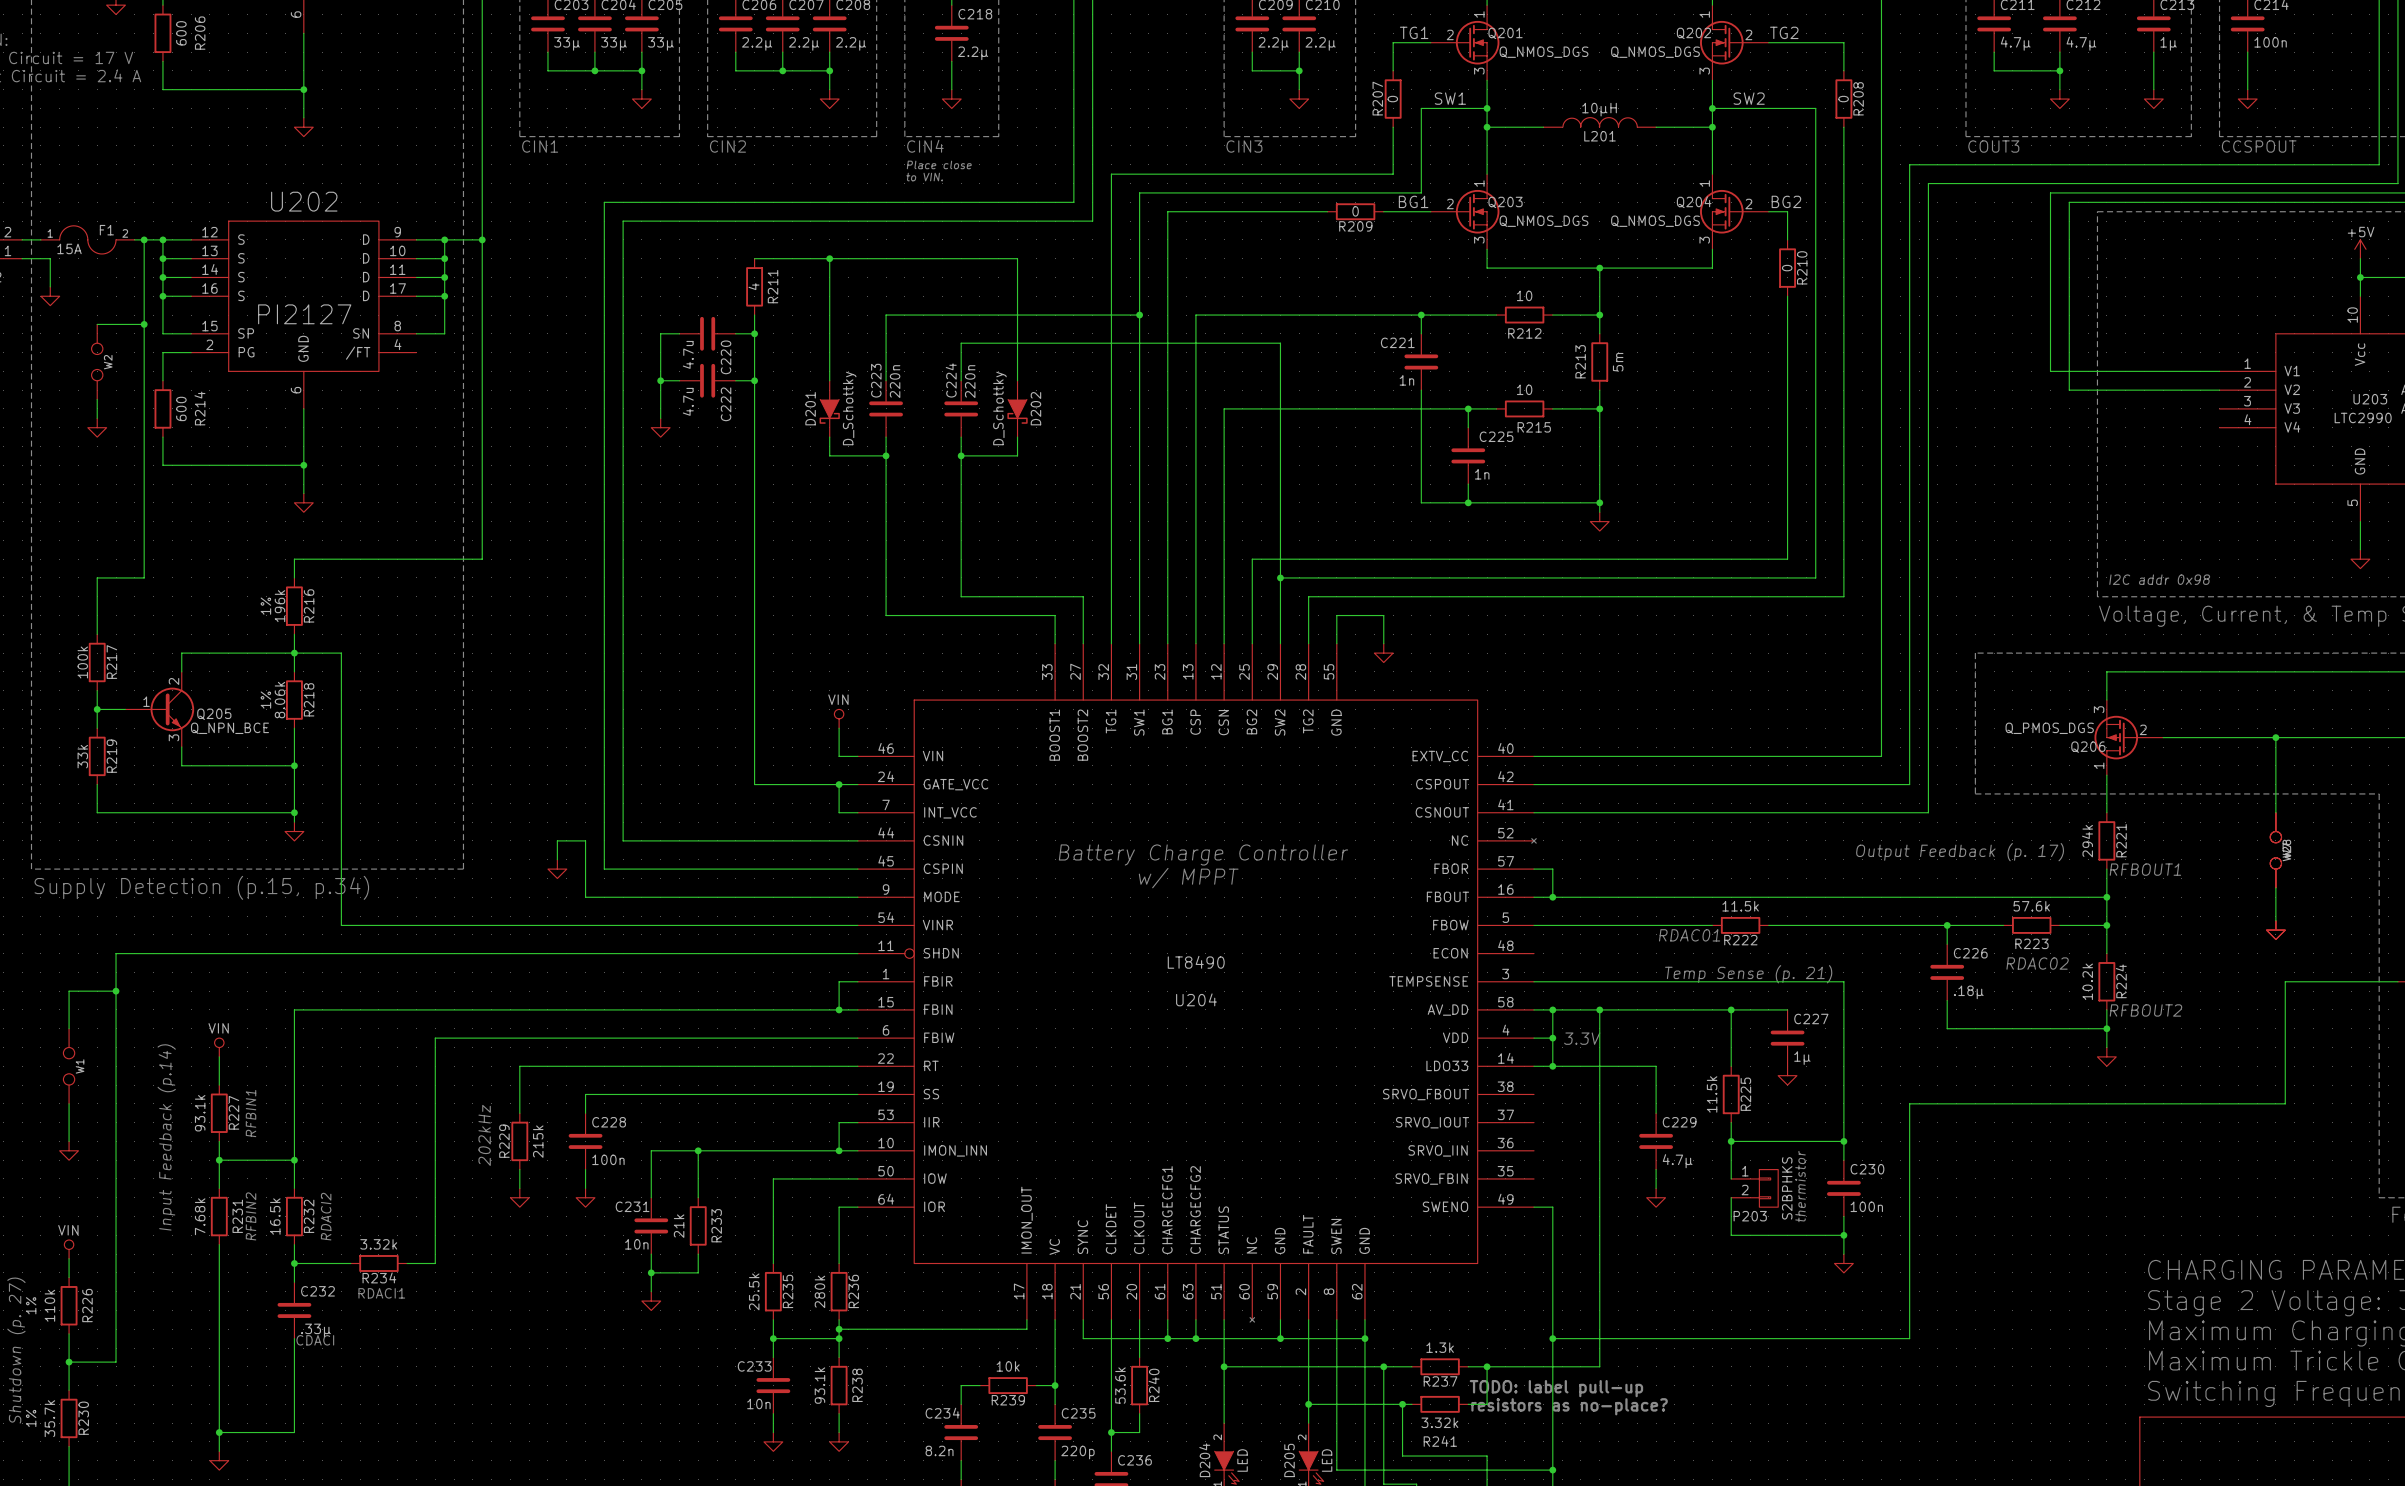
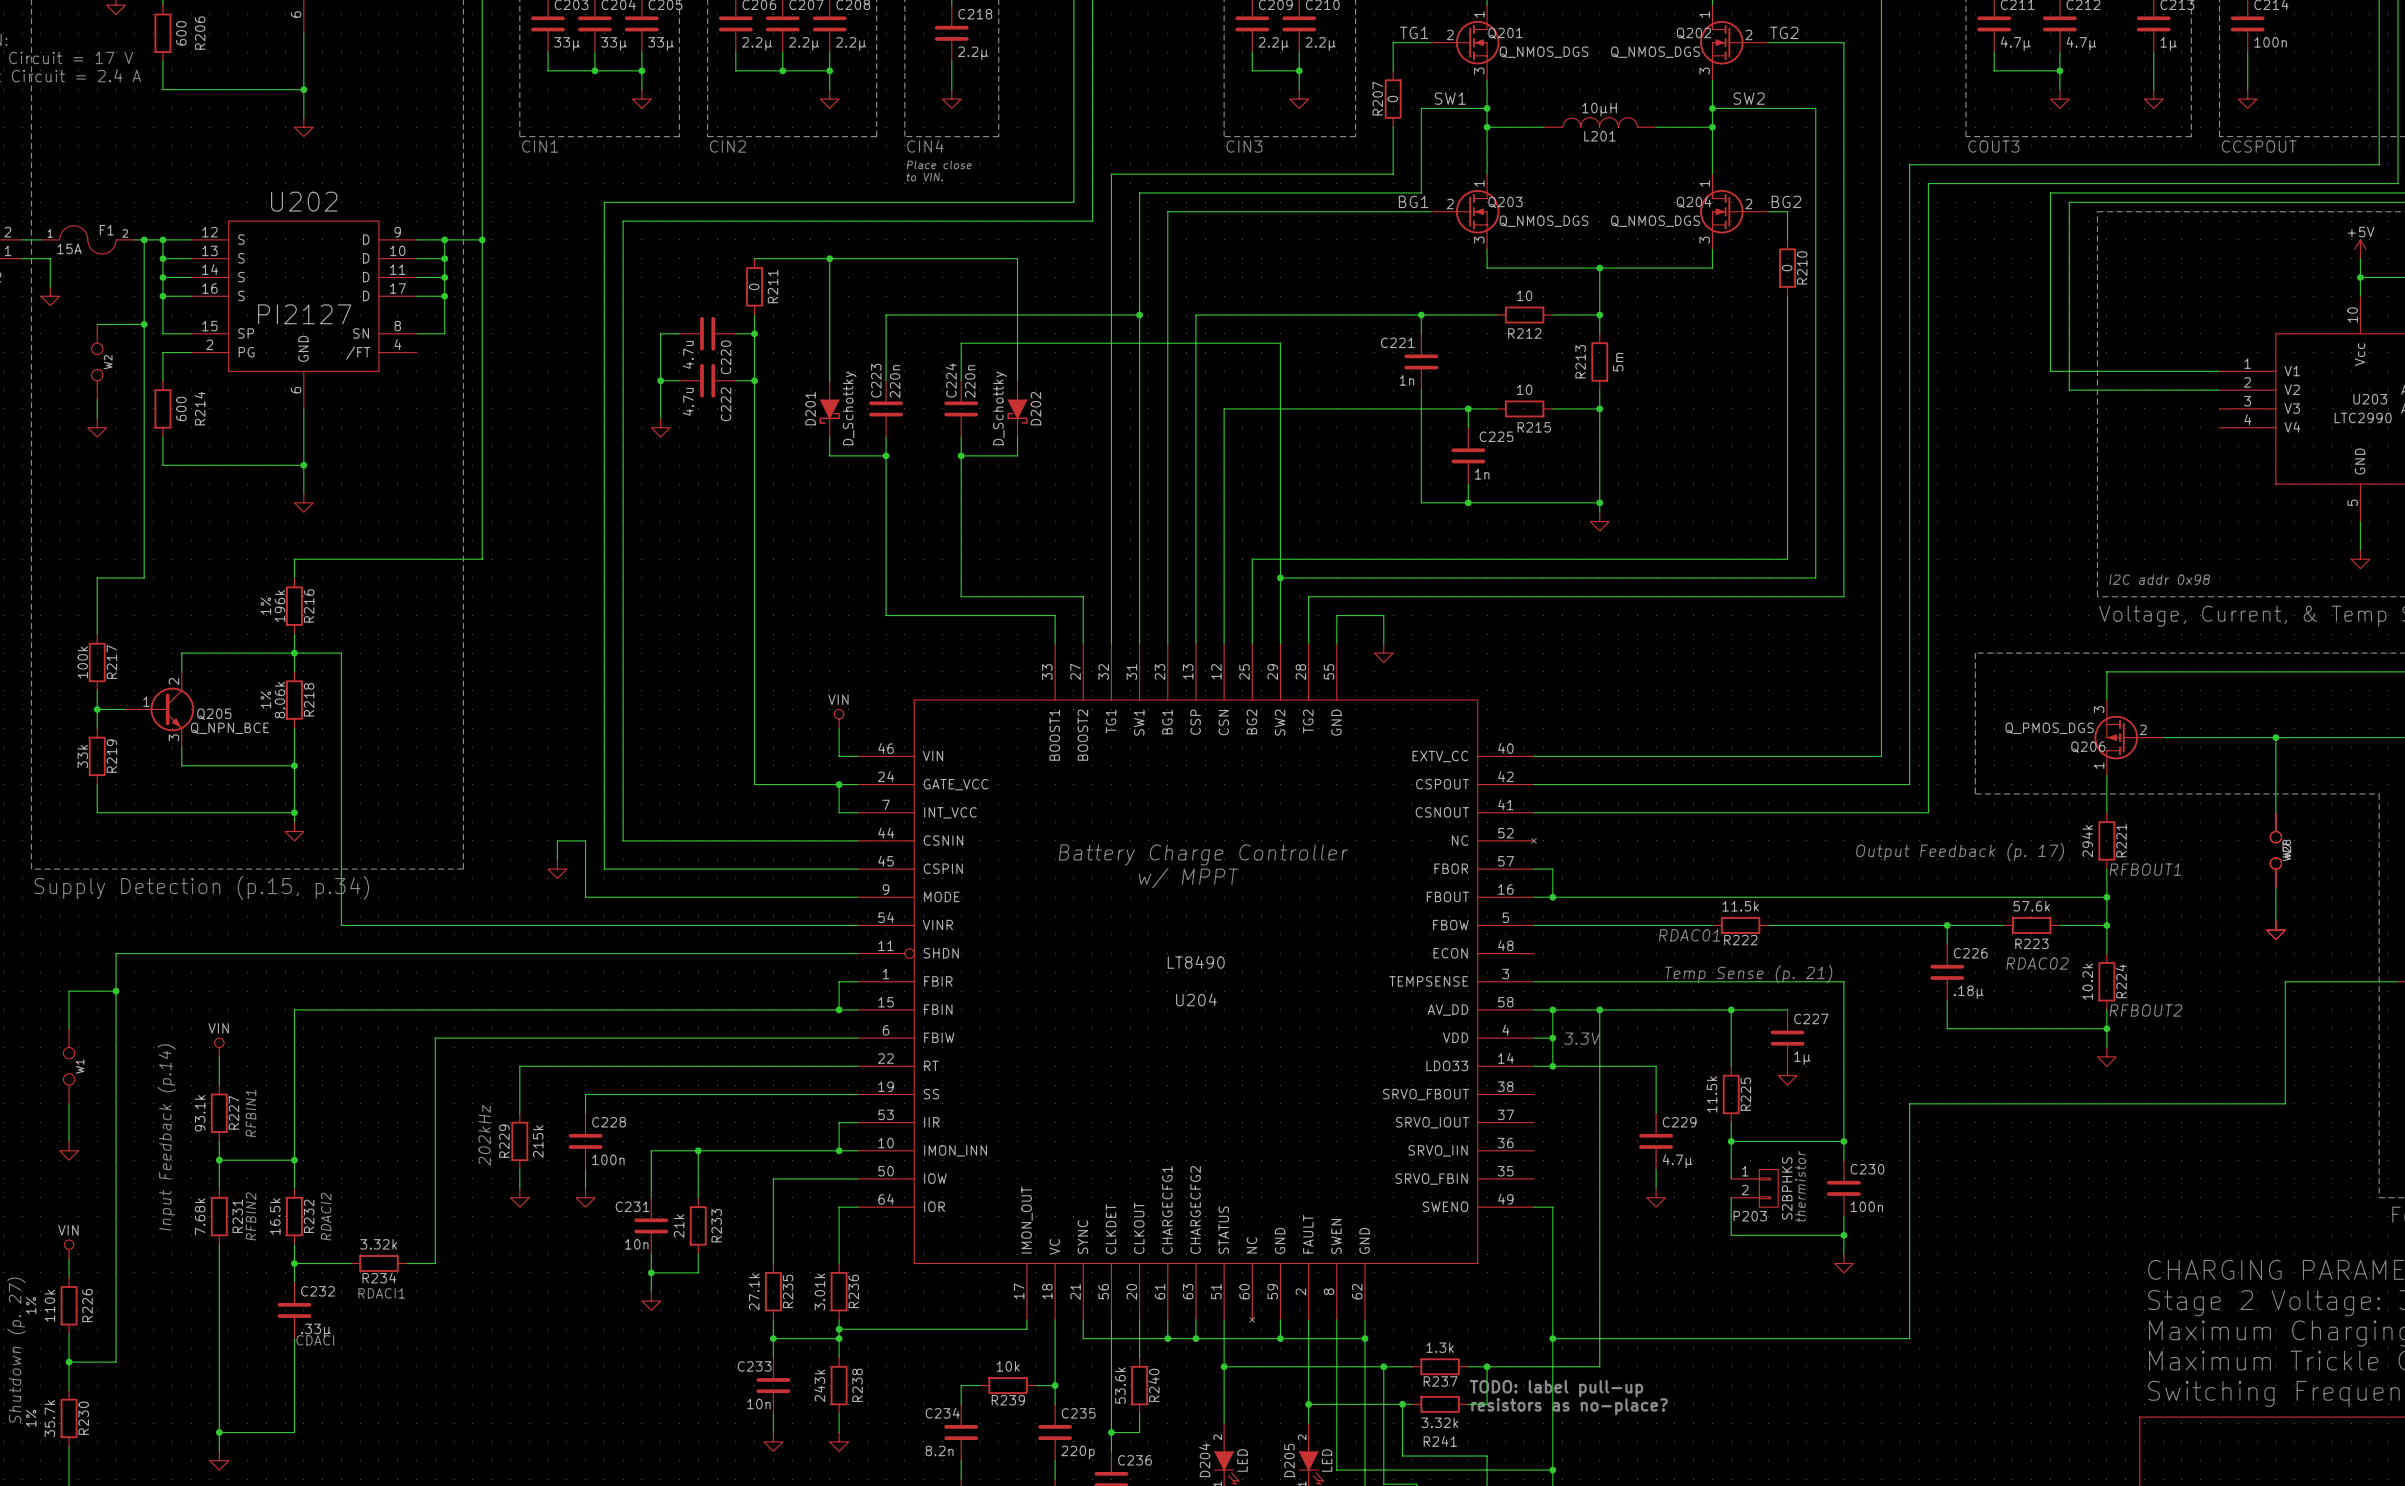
wire: none -> (1843, 70) (1843, 127)
R208: 0 (1843, 99) -> none
wire: none -> (1327, 211) (1383, 211)
R209: 0 (1355, 211) -> none
R211 value: 4 (754, 286) -> 0 (754, 286)
R235 value: 25.5k (754, 1291) -> 27.1k (754, 1291)
R236 value: 280k (819, 1291) -> 3.01k (819, 1291)
R238 value: 93.1k (819, 1385) -> 243k (819, 1385)

